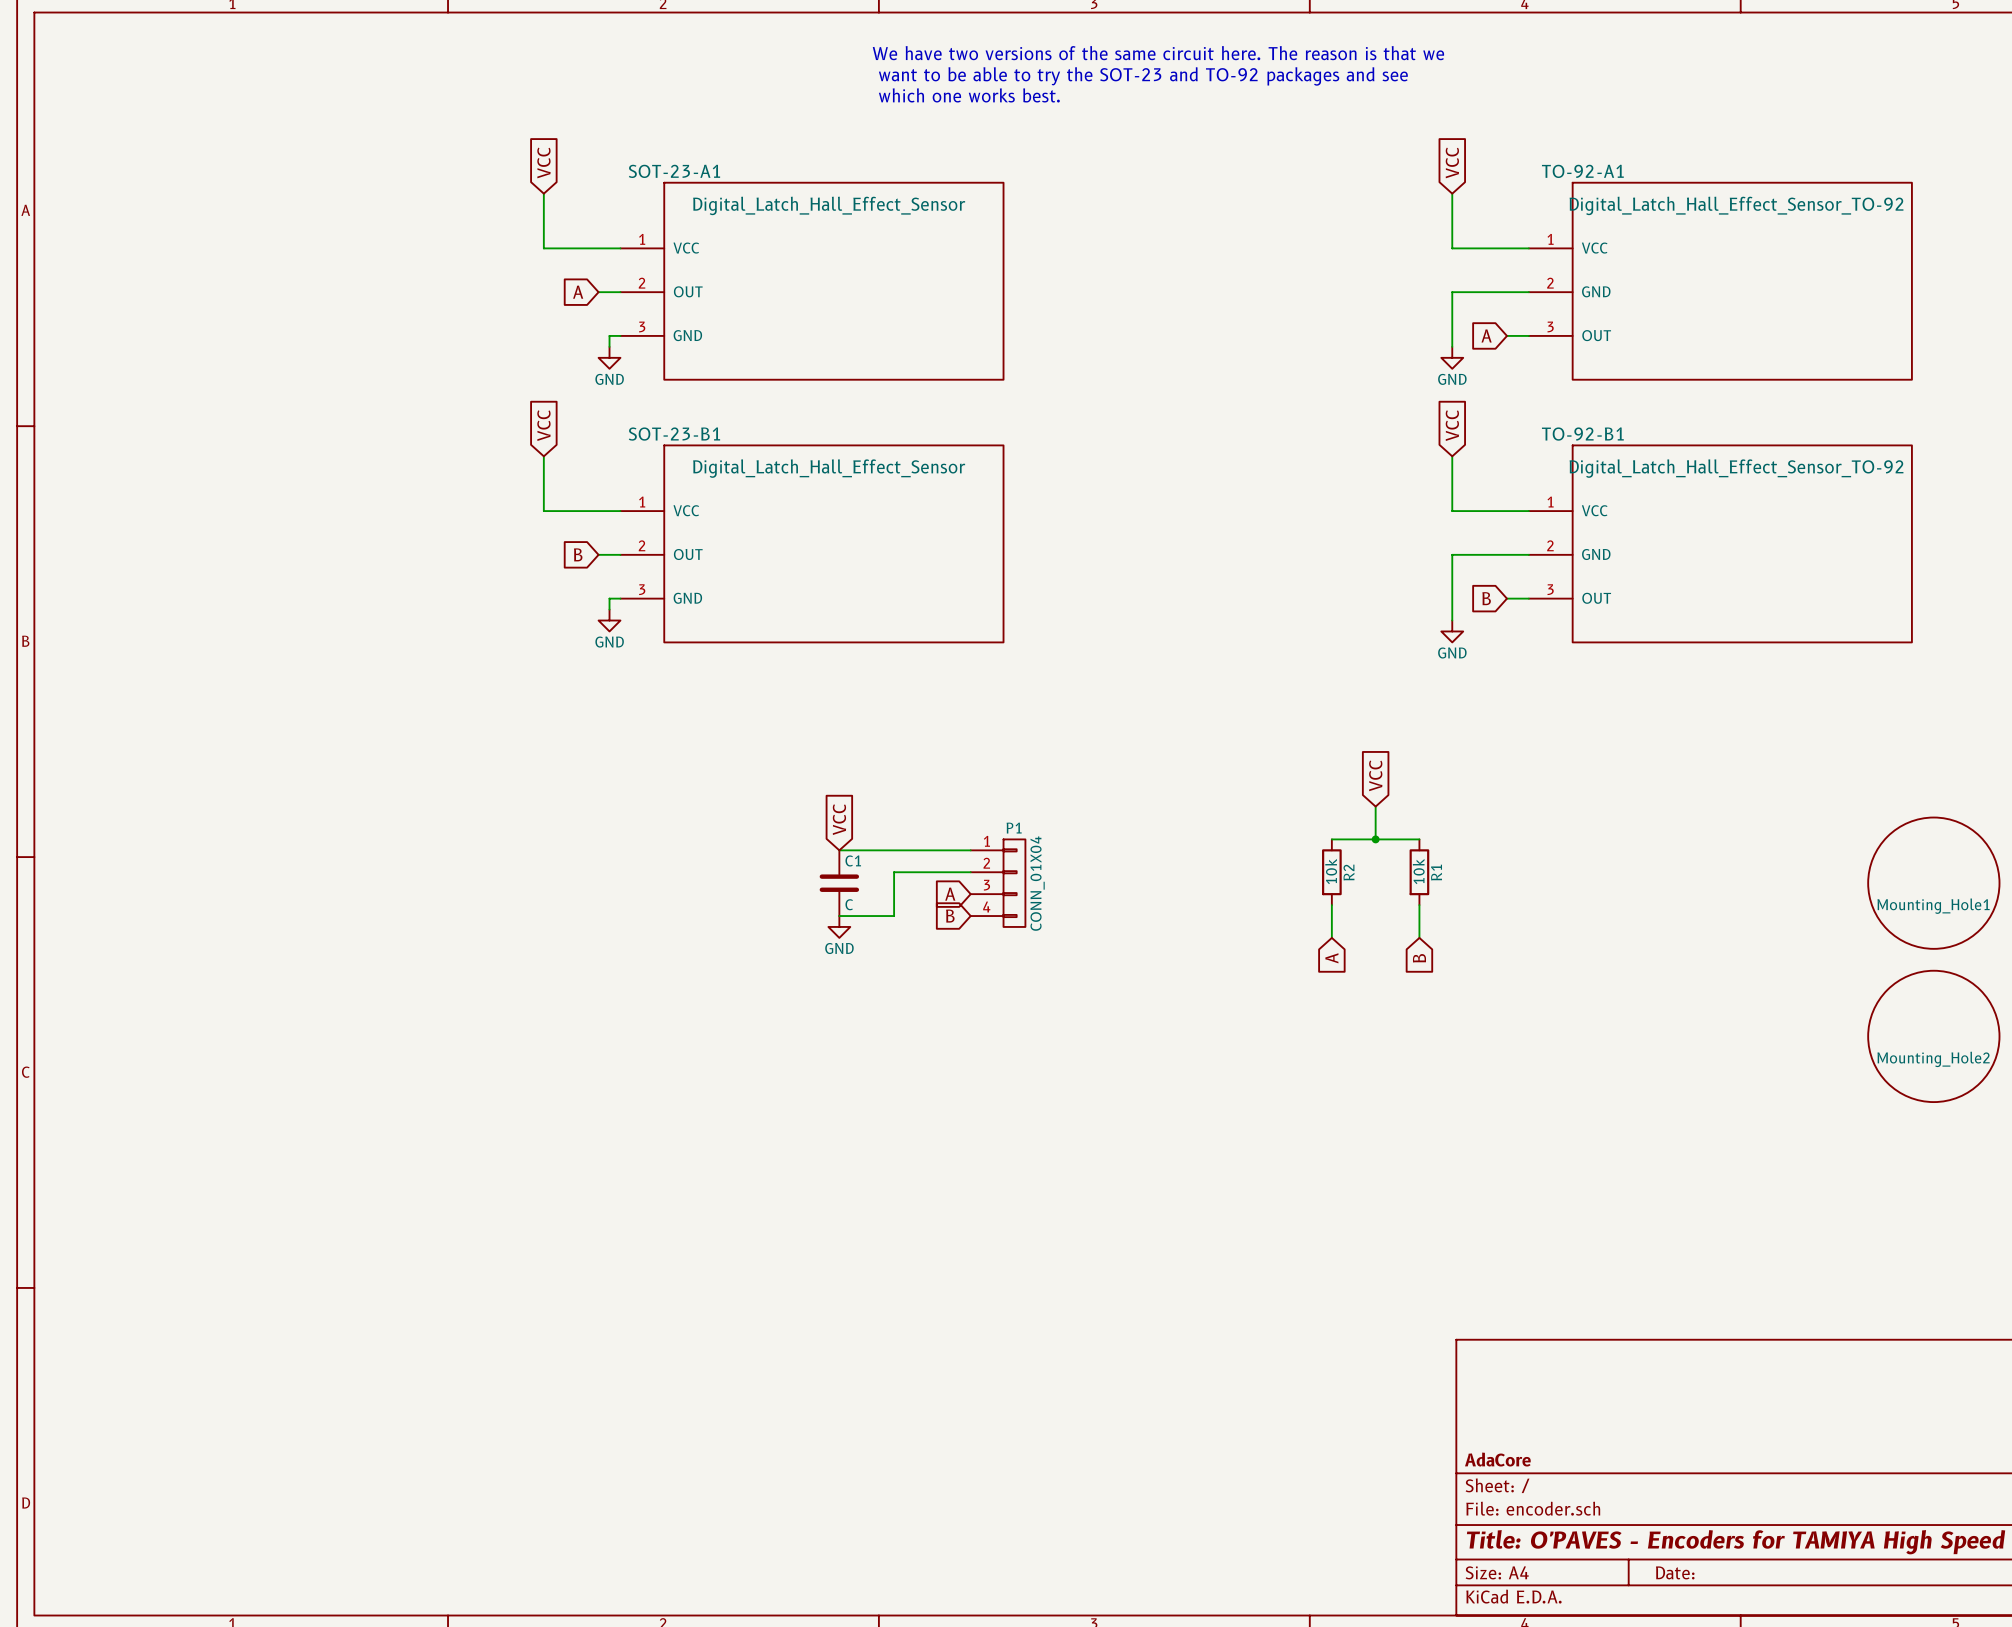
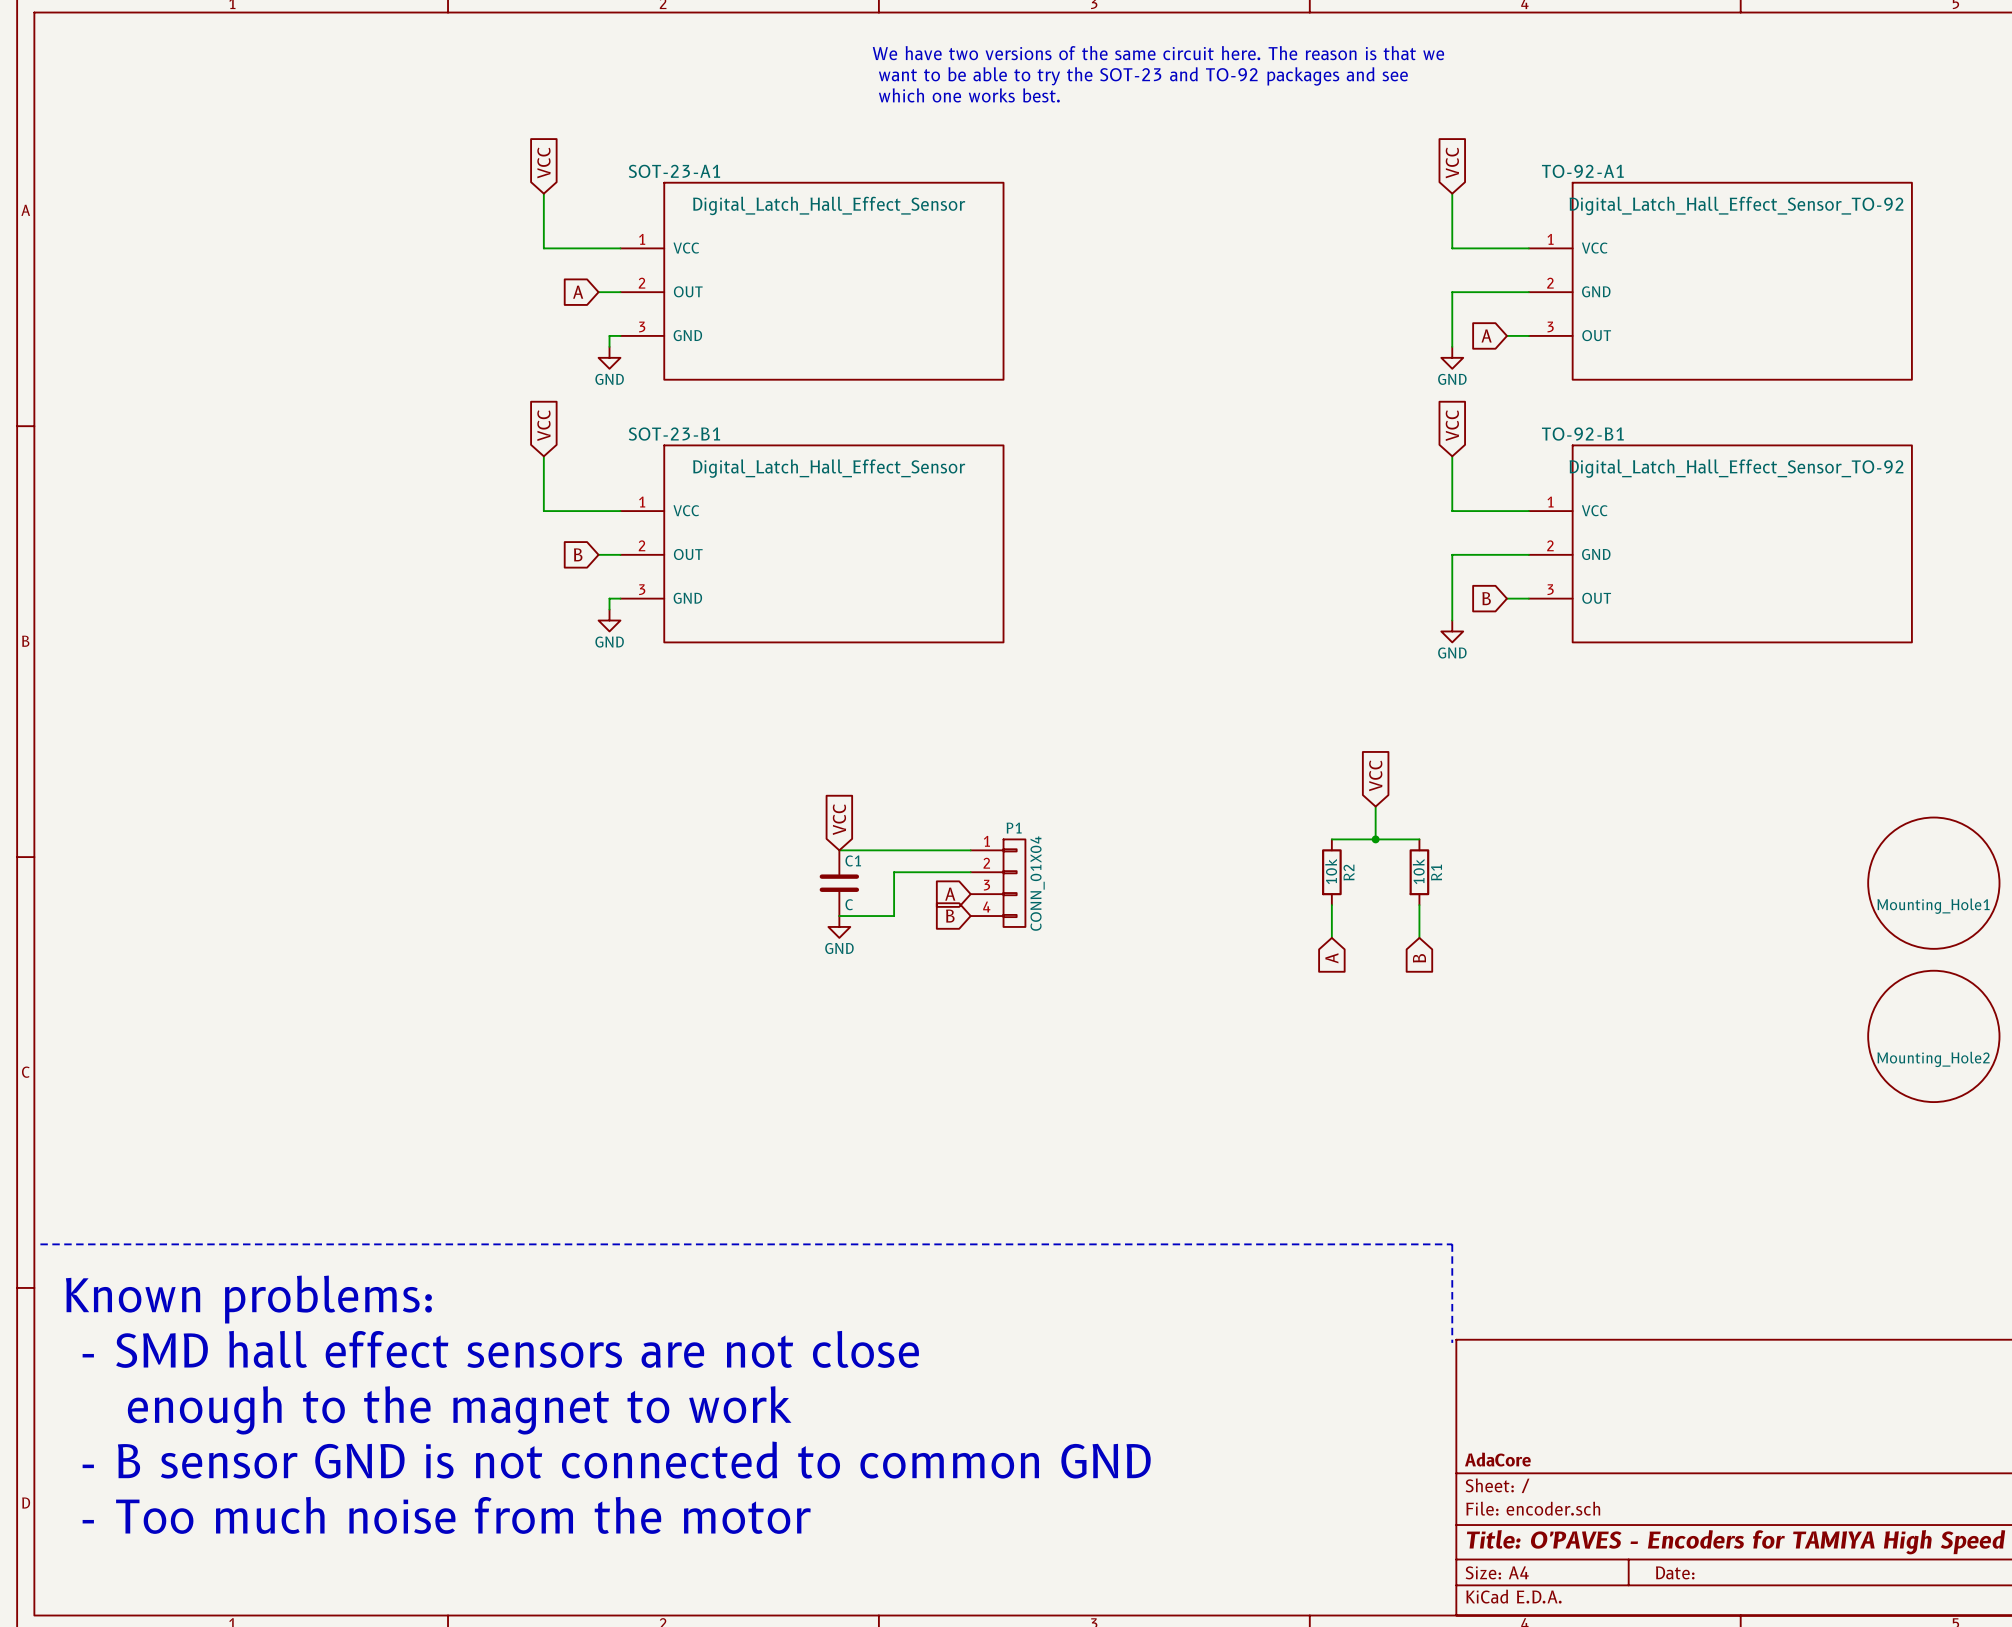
line: none -> (40, 1244) (1452, 1244) (1452, 1342)
text: none -> Known problems: (248, 1299)
text: none -> - SMD hall effect sensors are not close (500, 1349)
text: none -> enough to the magnet to work (459, 1410)
text: none -> - B sensor GND is not connected to common GND (616, 1460)
text: none -> - Too much noise from the motor (446, 1515)

